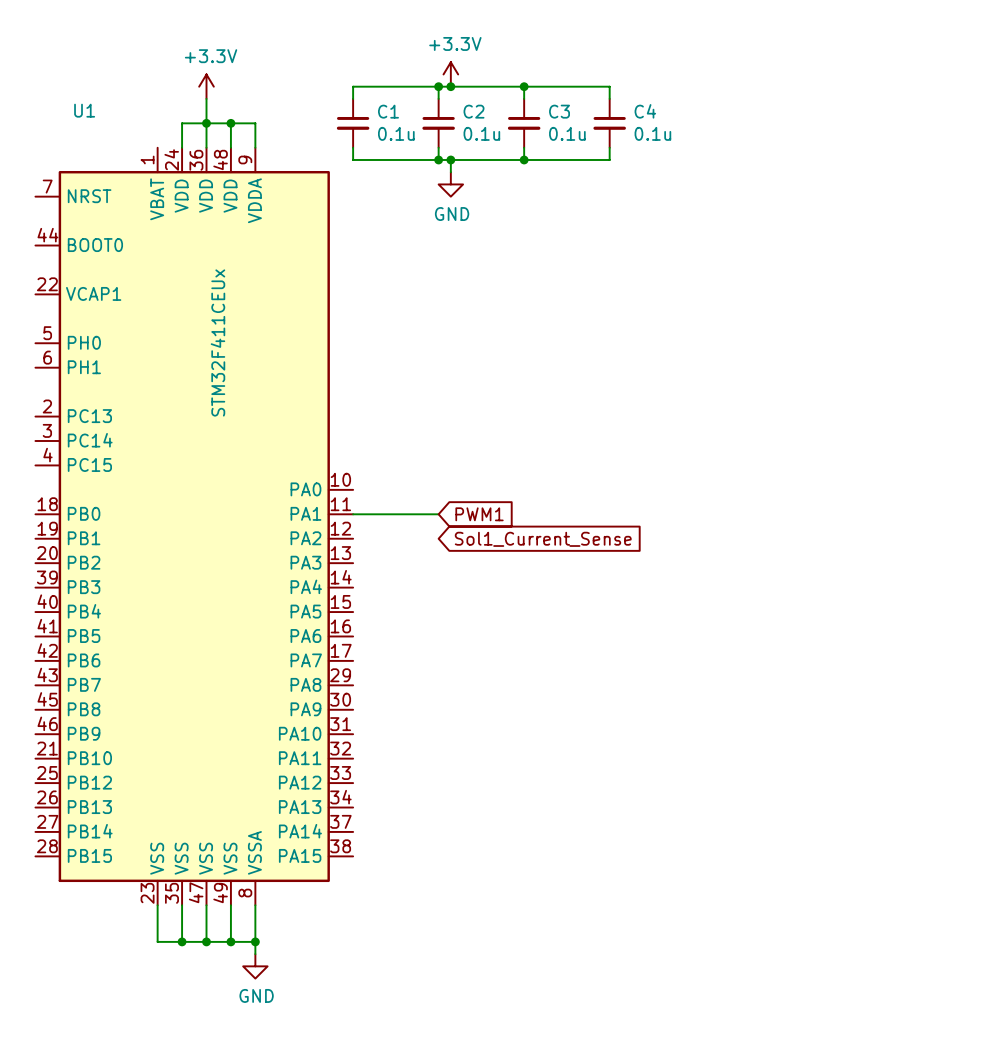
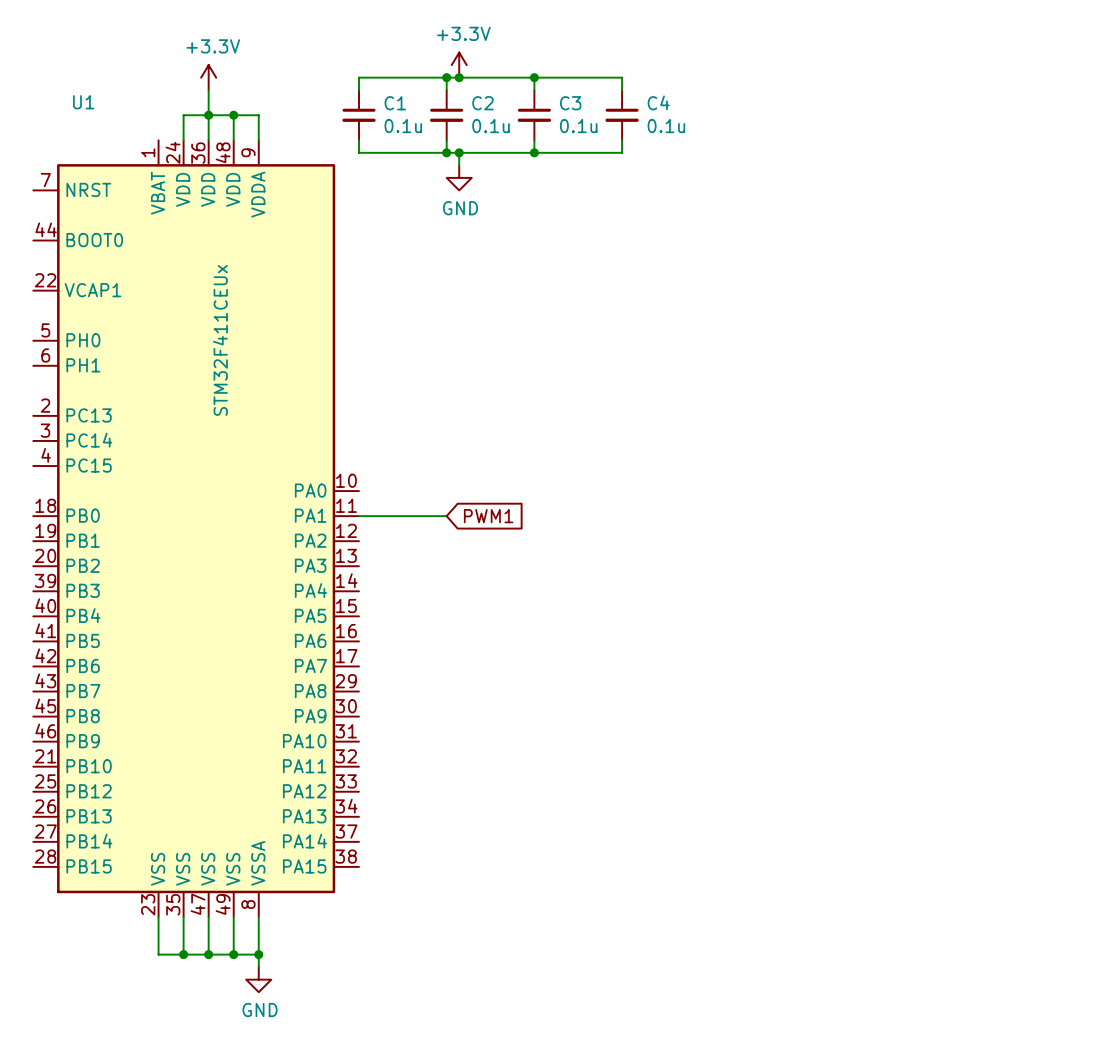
global label: Sol1_Current_Sense (543, 539) -> none

